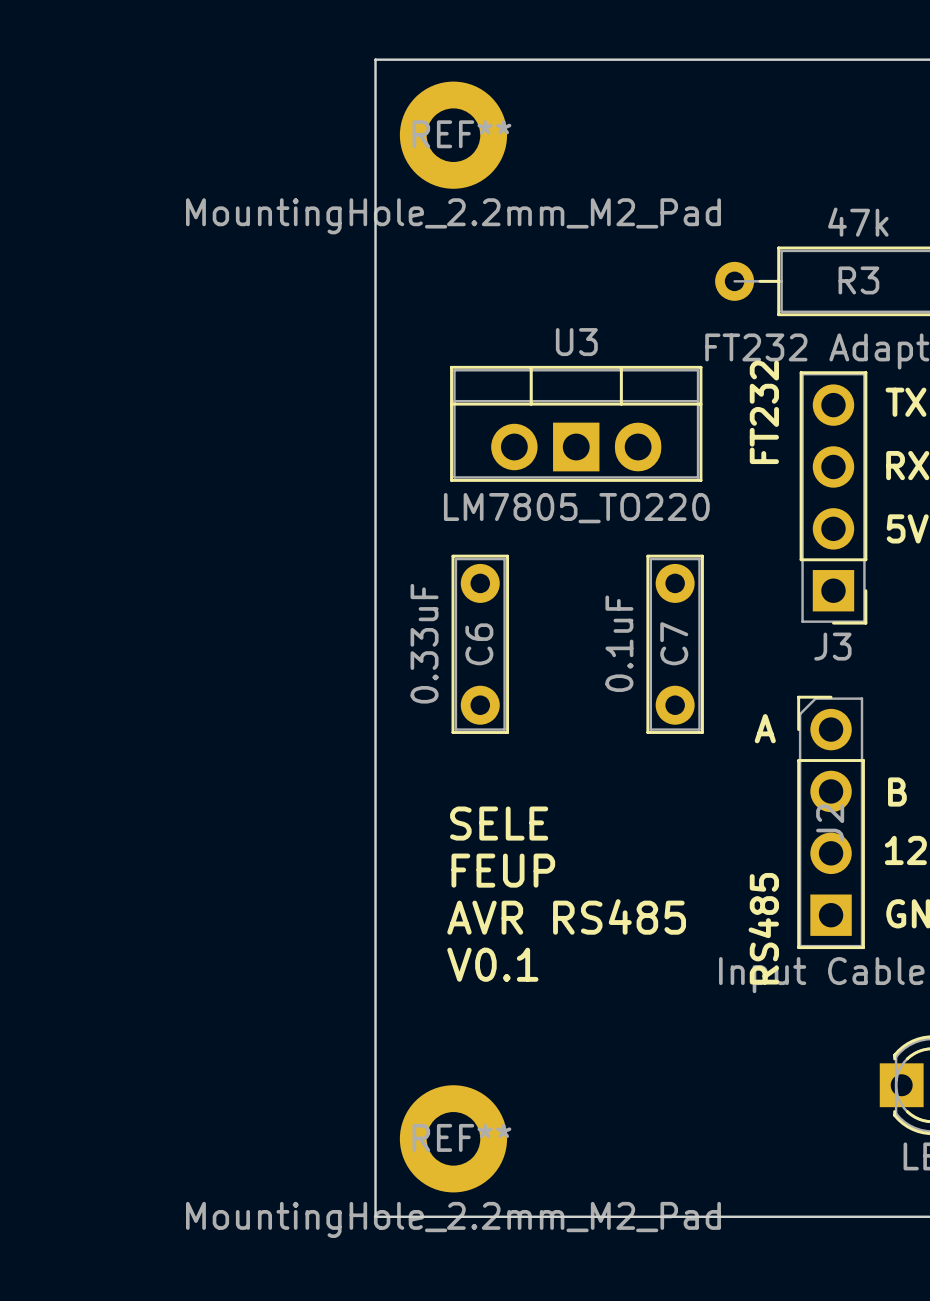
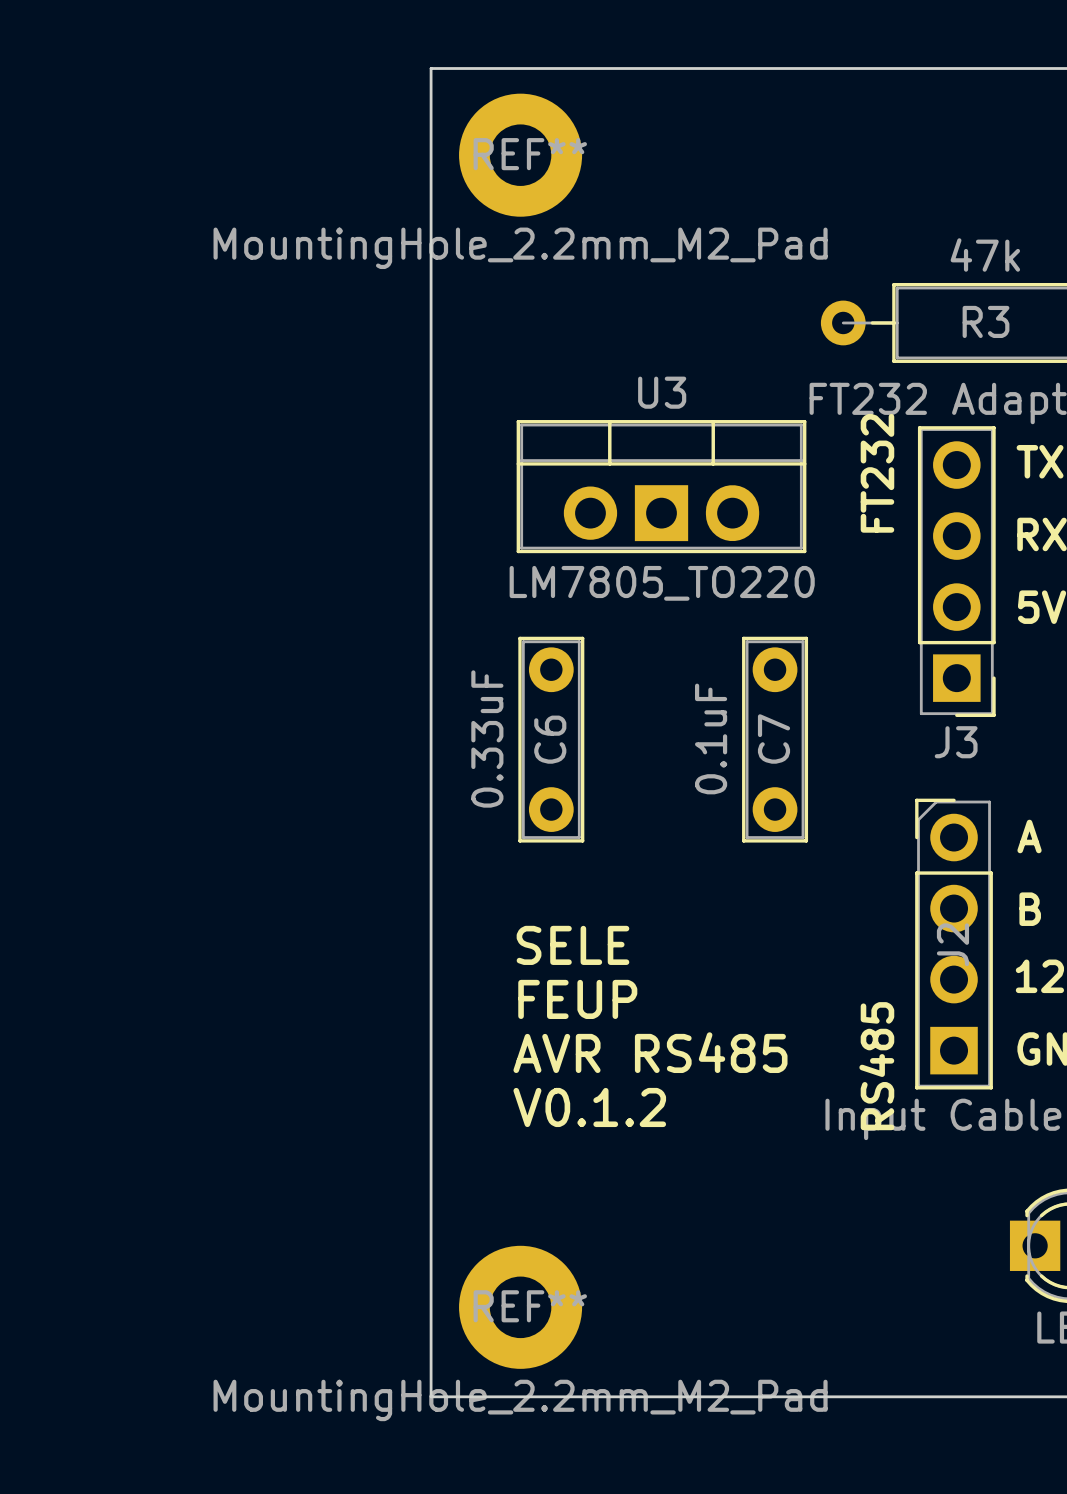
text position: A (765, 728) -> A (1029, 836)
text: V0.1 (492, 964) -> V0.1.2 (589, 1107)

